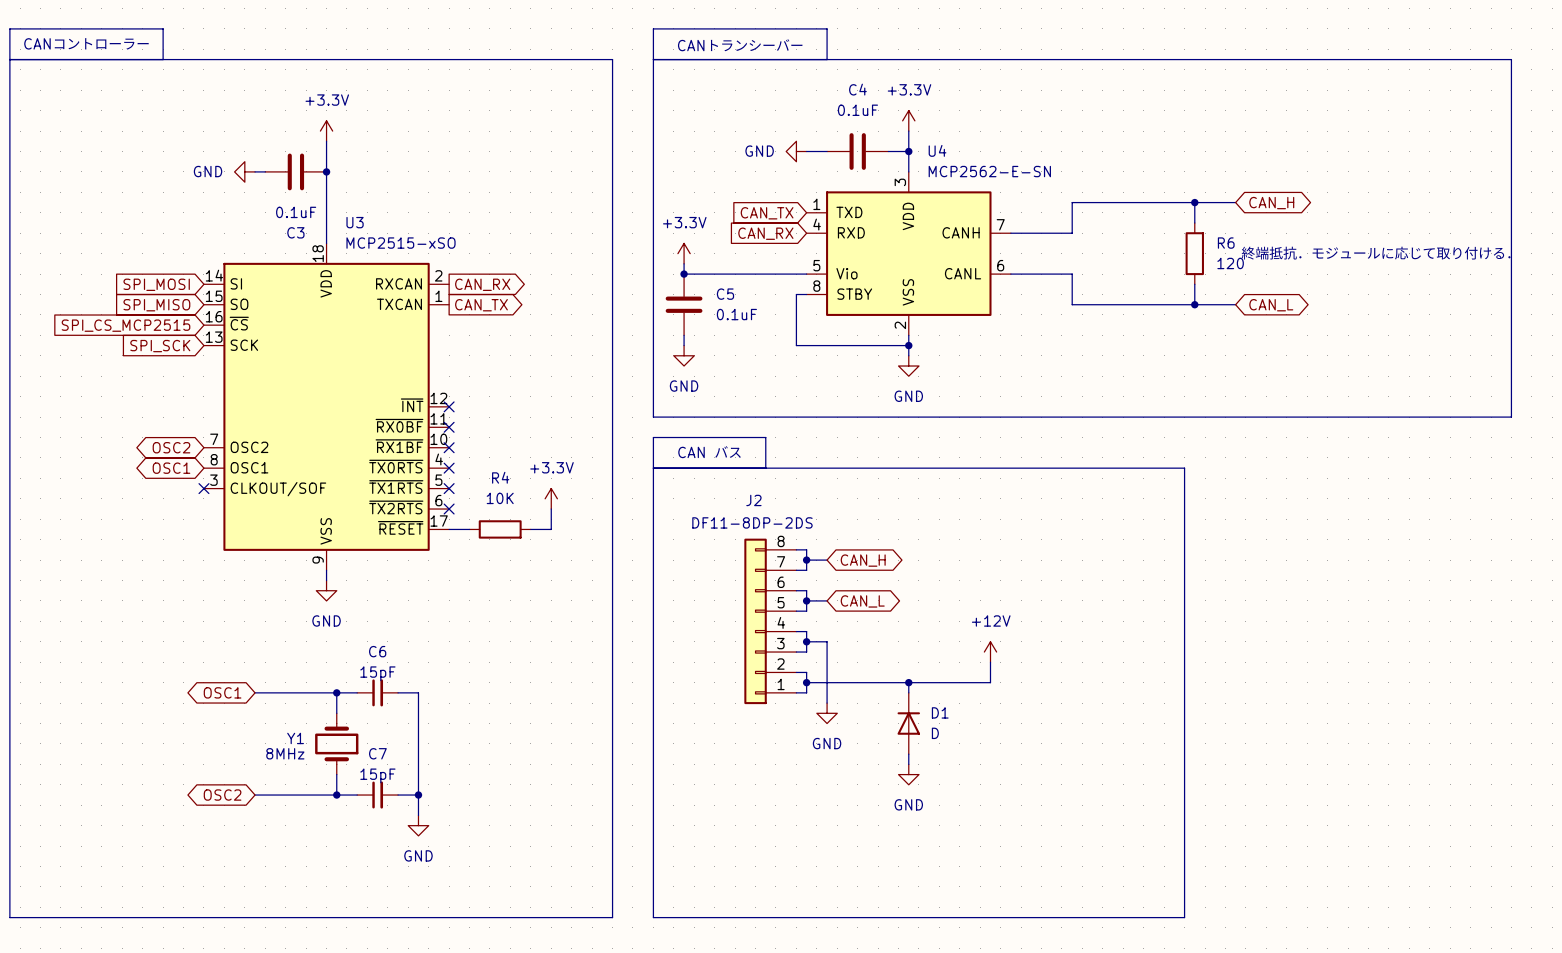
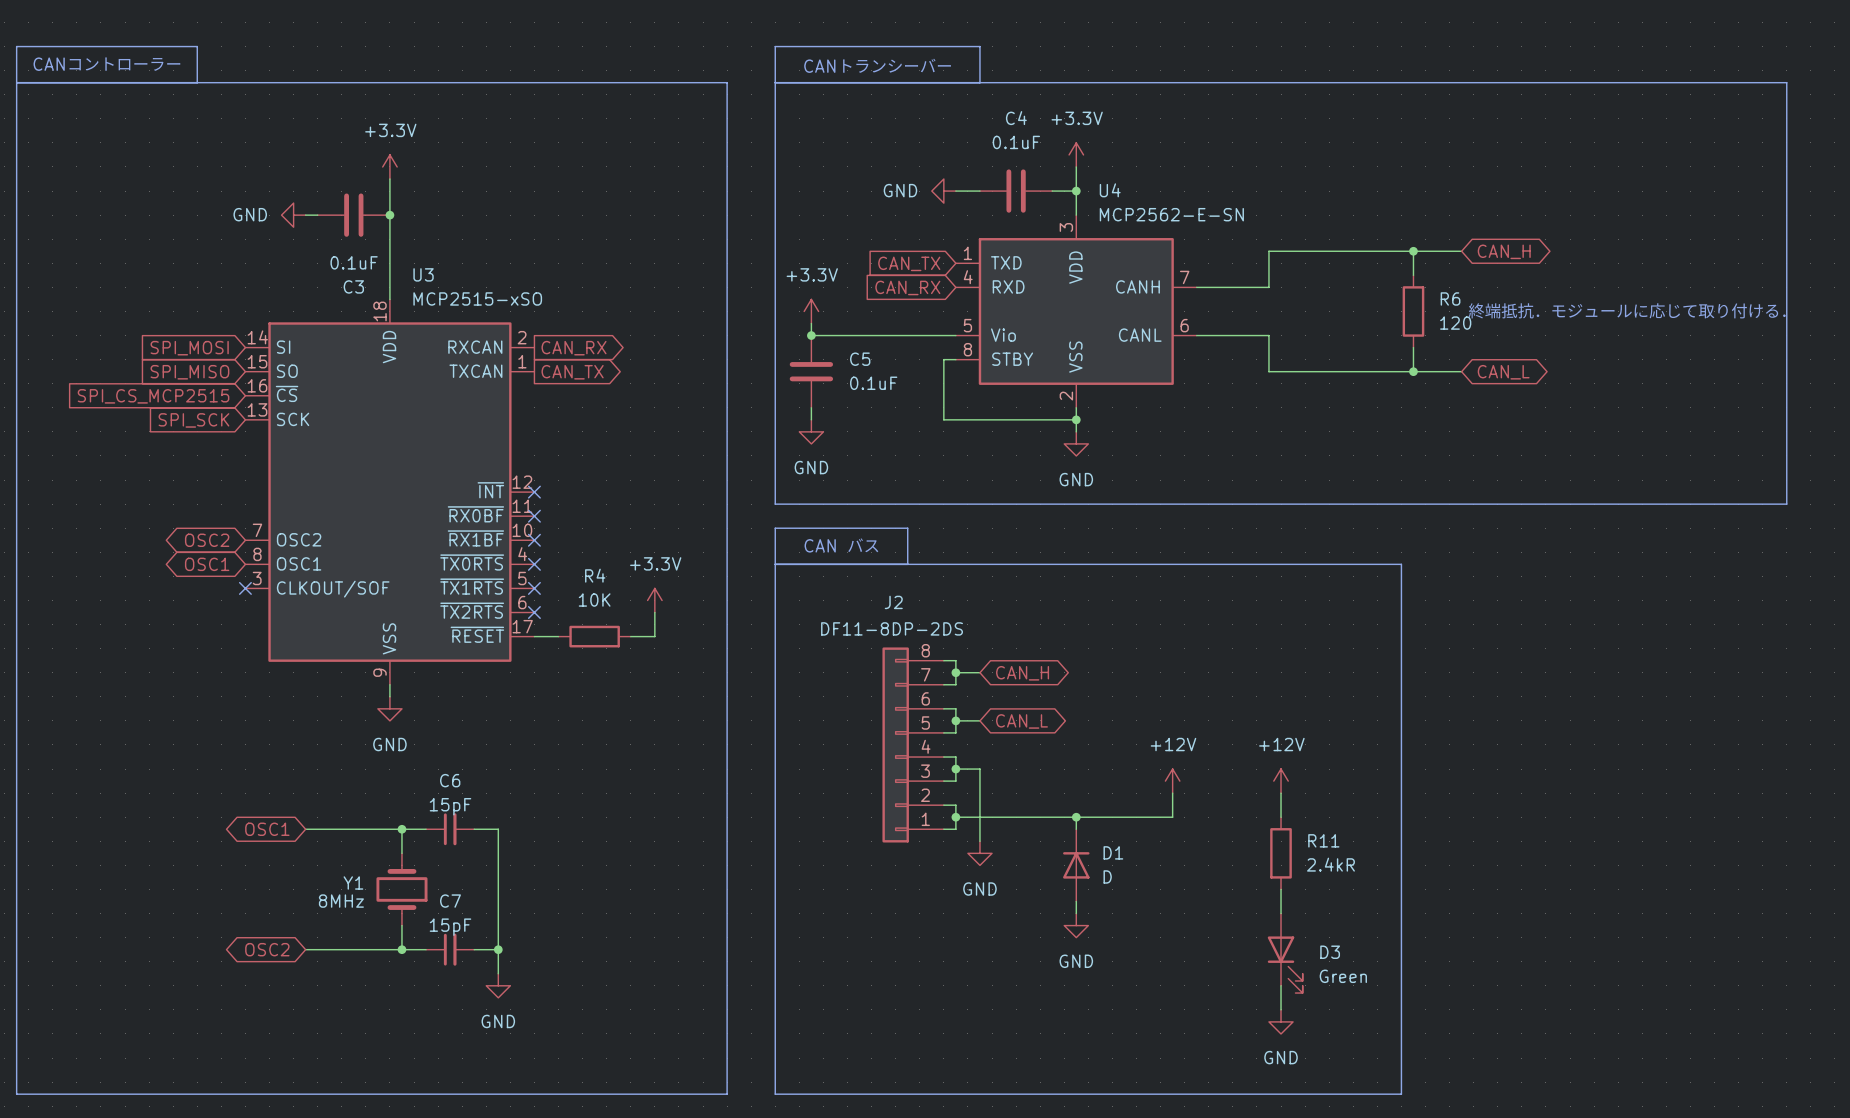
power symbol: none -> +12V (1281, 781)
wire: none -> (1281, 793) (1281, 817)
R11: none -> 2.4kR (1281, 853)
wire: none -> (1281, 889) (1281, 913)
D3: none -> Green (1285, 953)
wire: none -> (1281, 985) (1281, 1009)
power symbol: none -> GND (1281, 1021)

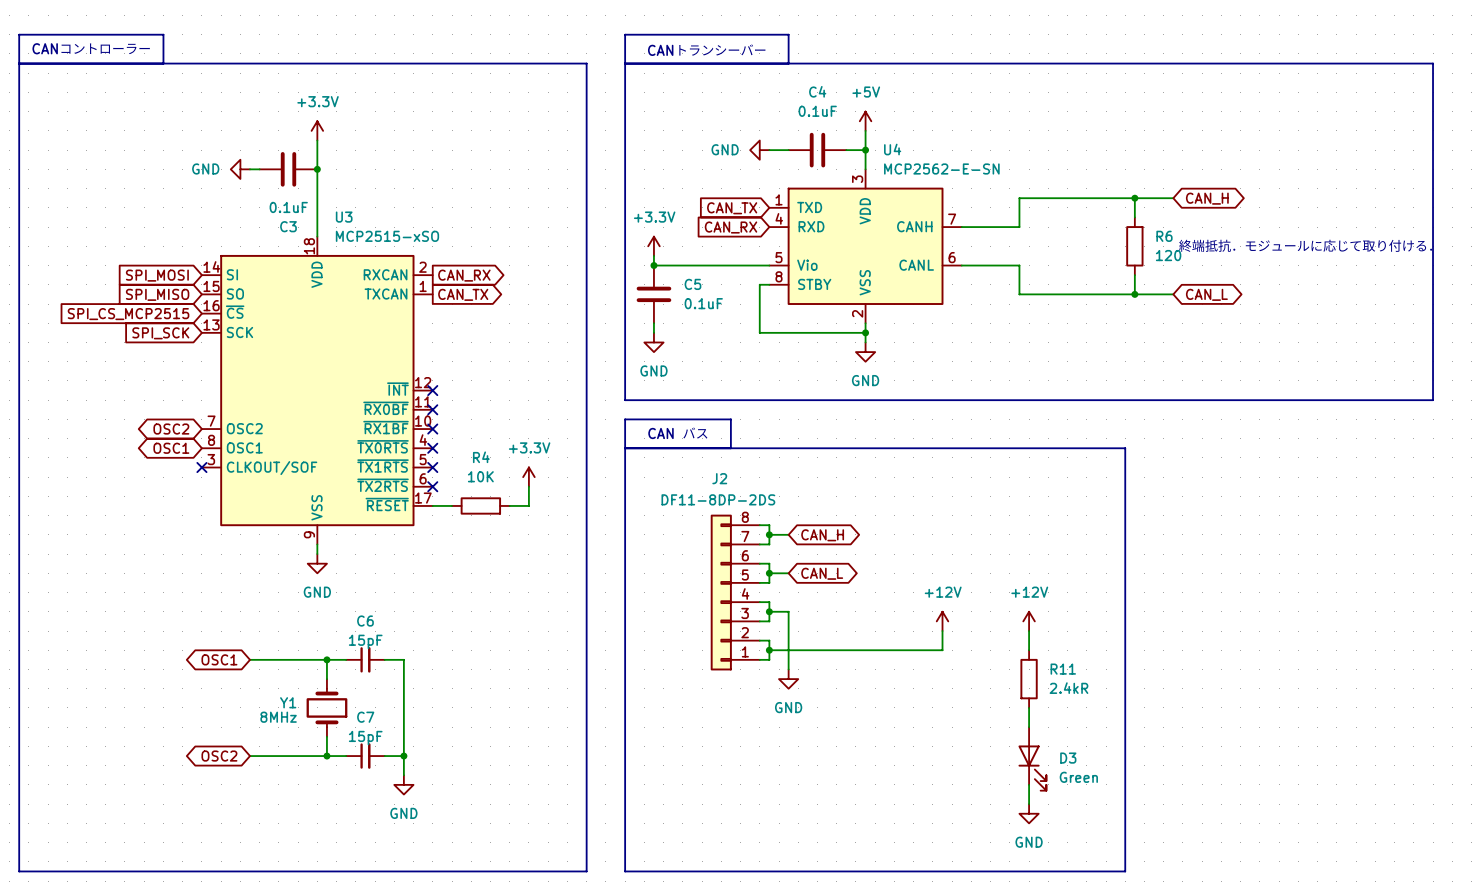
power symbol: +3.3V (1076, 154) -> +5V (865, 121)
wire: (1076, 817) (1076, 829) -> none
junction: (1076, 817) -> none
D1: D (1076, 865) -> none
wire: (1076, 901) (1076, 913) -> none
power symbol: GND (1076, 925) -> none

